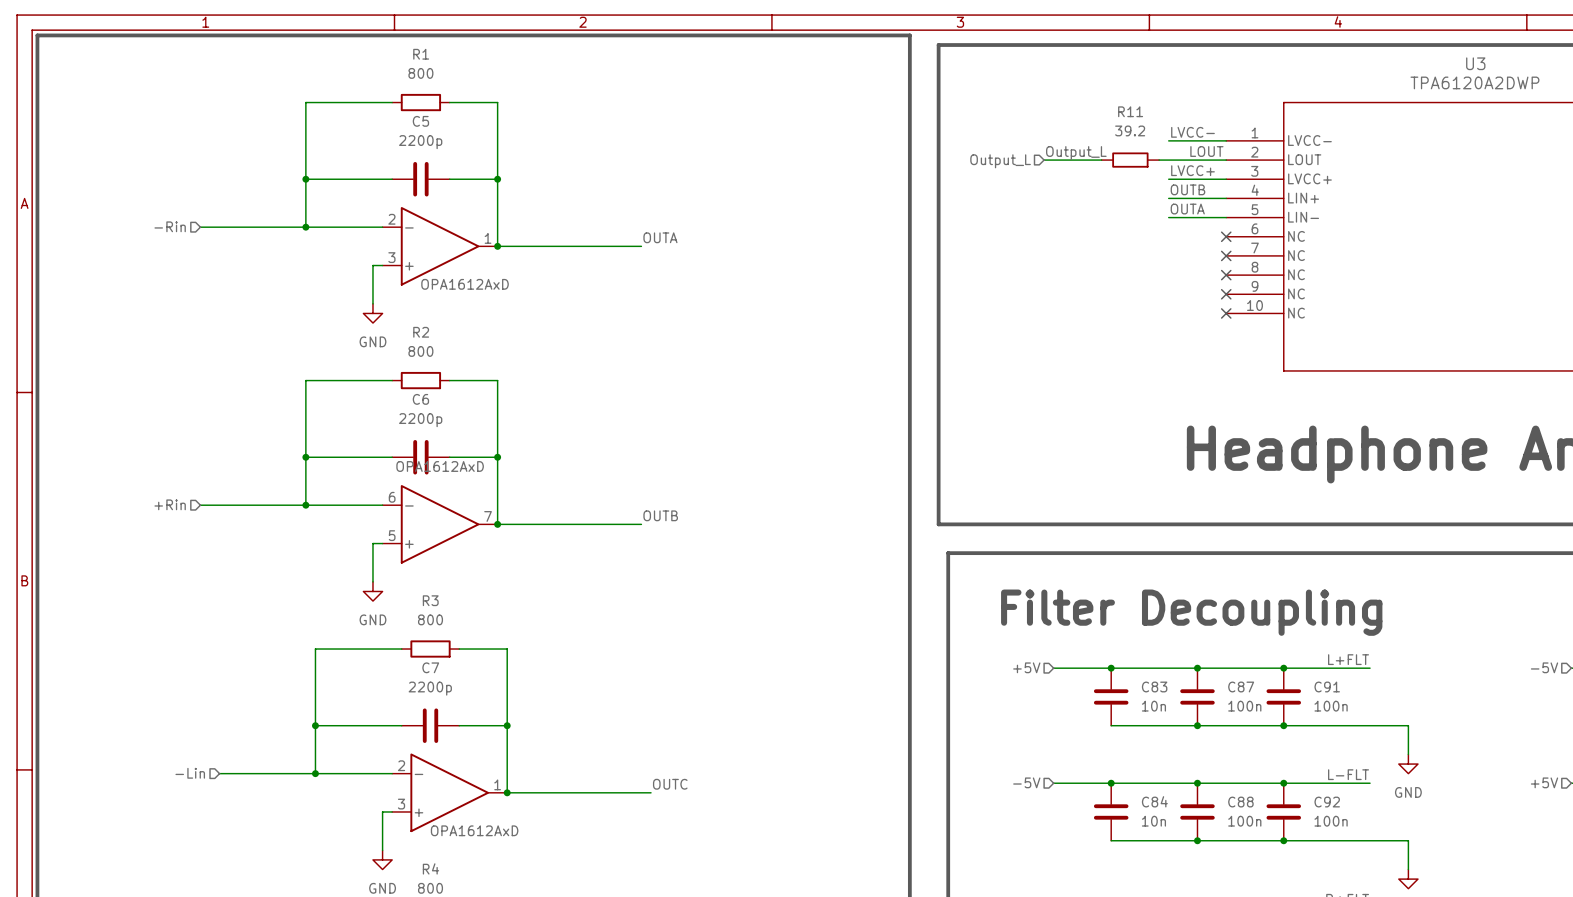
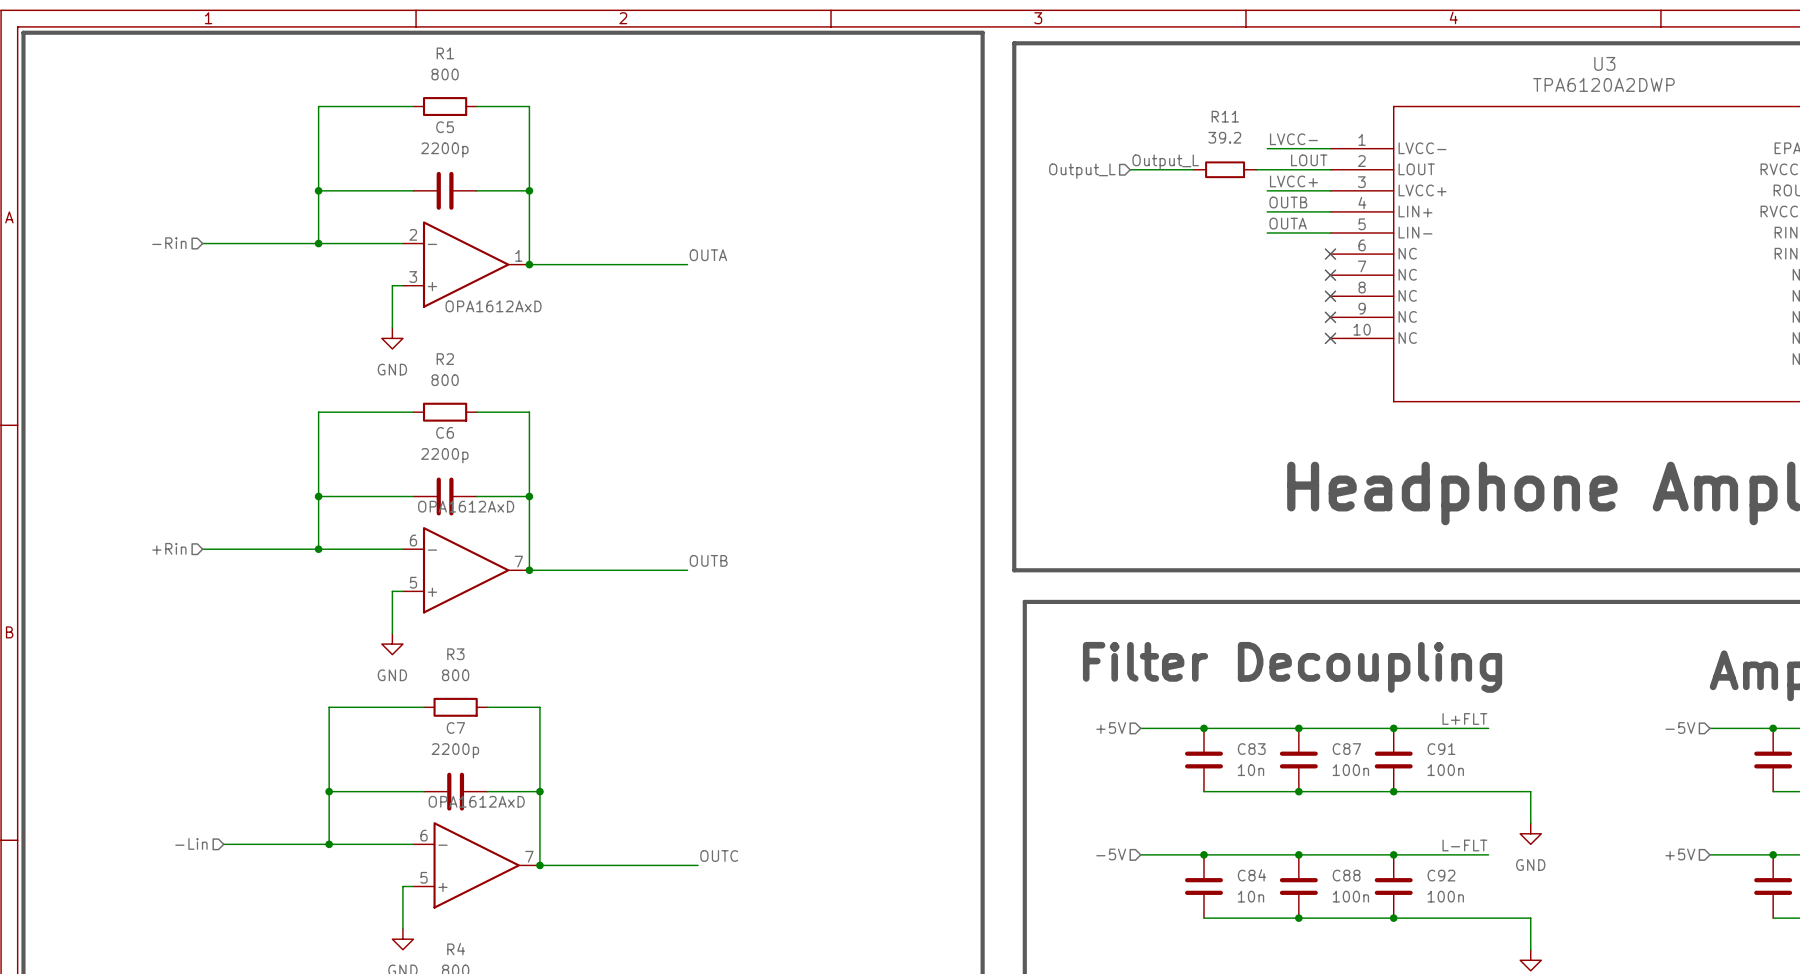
part pin number: 2 (401, 765) -> 6 (424, 835)
part pin number: 1 (497, 784) -> 7 (529, 856)
part pin number: 3 (401, 804) -> 5 (424, 877)
part value position: OPA1612AxD (474, 830) -> OPA1612AxD (476, 801)

